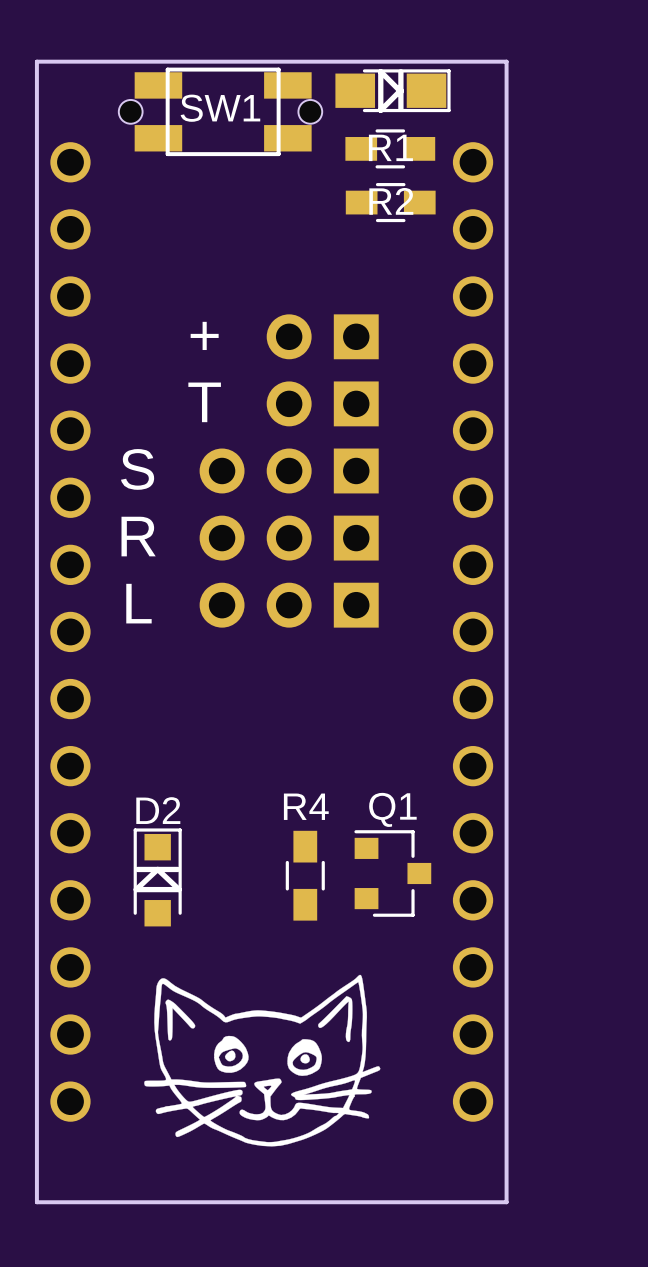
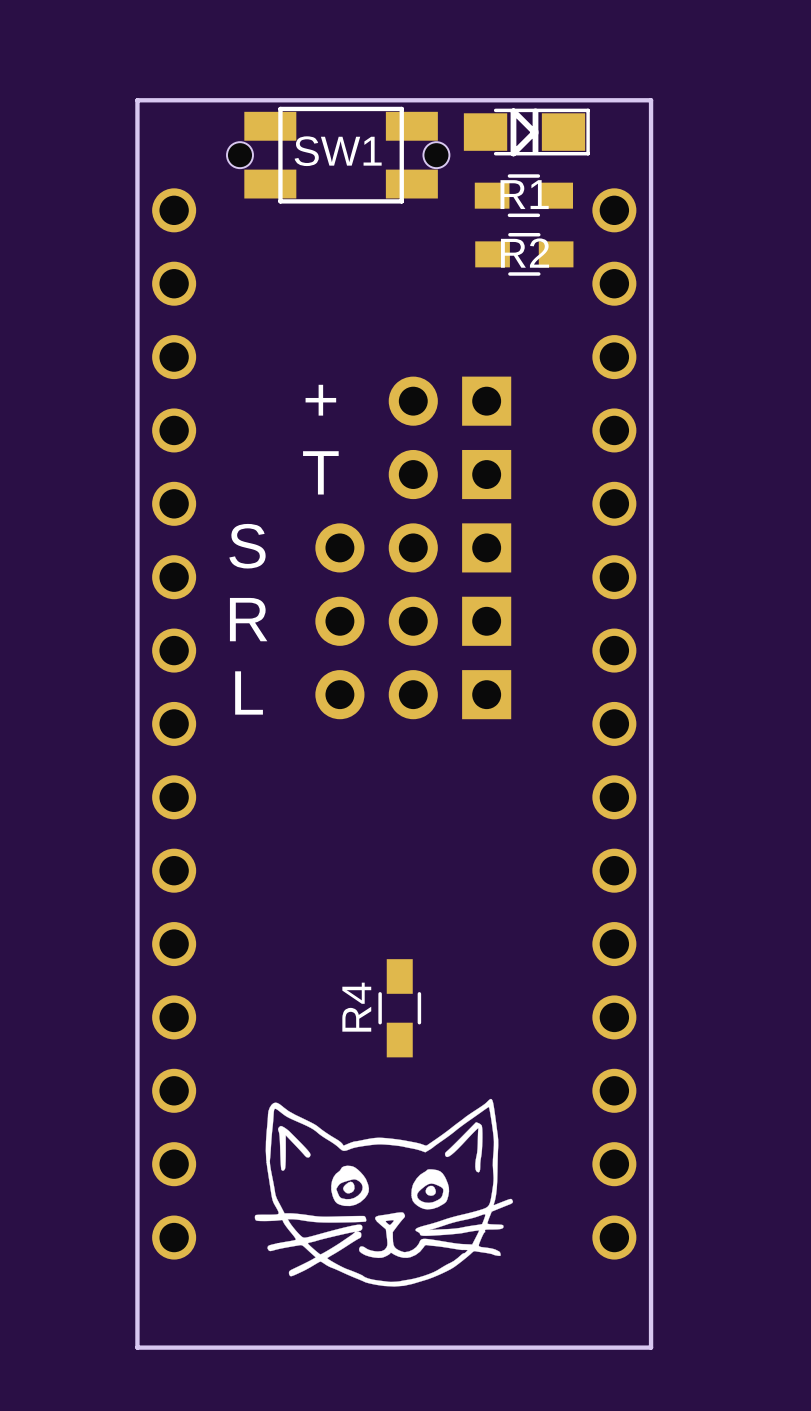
R4 name rotation: 0° (306, 806) -> 90° counterclockwise (356, 1007)
R4 name position: R4 (306, 806) -> R4 (356, 1007)
line: (137, 869) (177, 869) -> none
line: (157, 869) (179, 889) (136, 889) (157, 869) -> none
Q1: (392, 873) -> none
R4 position: (305, 875) -> (399, 1008)
D2: (157, 877) -> none

